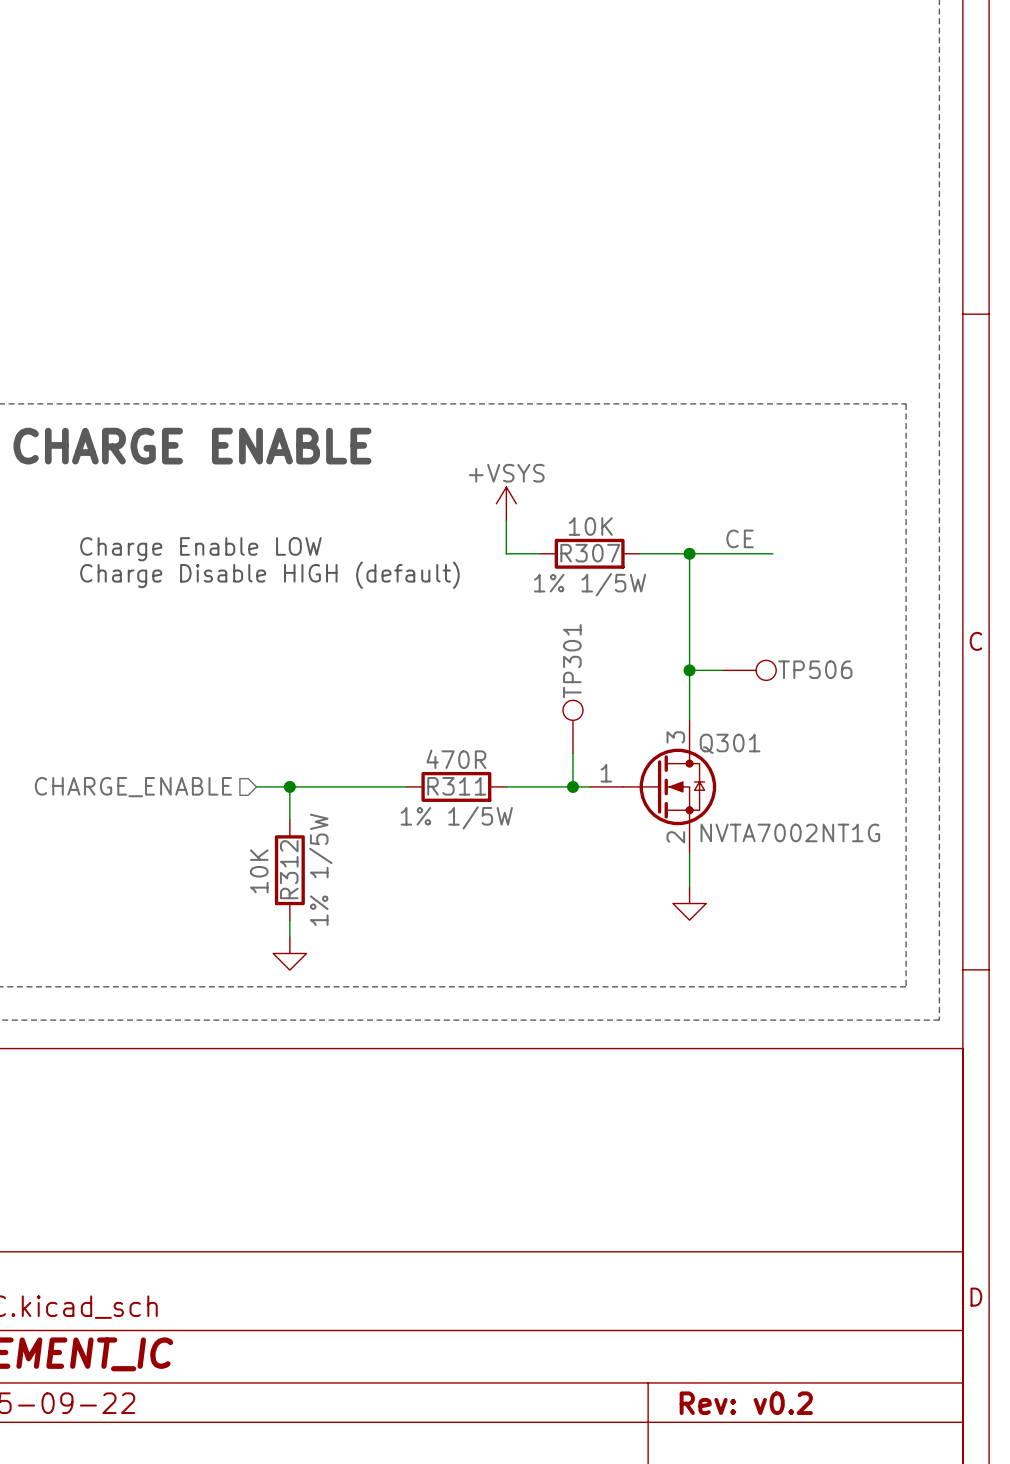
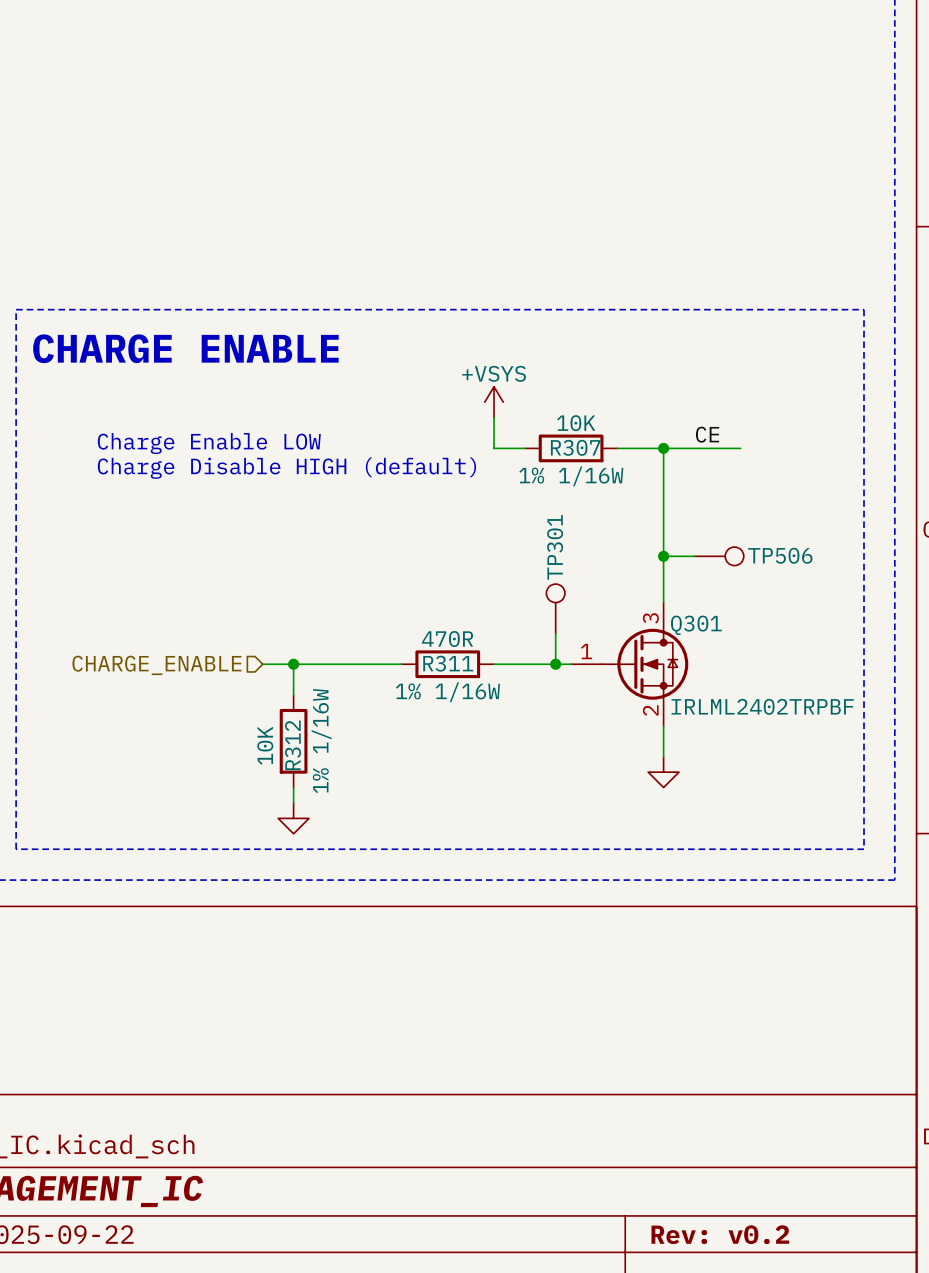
R307 text: 1% 1/5W (590, 584) -> 1% 1/16W (571, 476)
R311 text: 1% 1/5W (456, 817) -> 1% 1/16W (447, 692)
Q301 value: NVTA7002NT1G (790, 832) -> IRLML2402TRPBF (762, 706)
R312 text: 1% 1/5W (320, 869) -> 1% 1/16W (321, 741)

